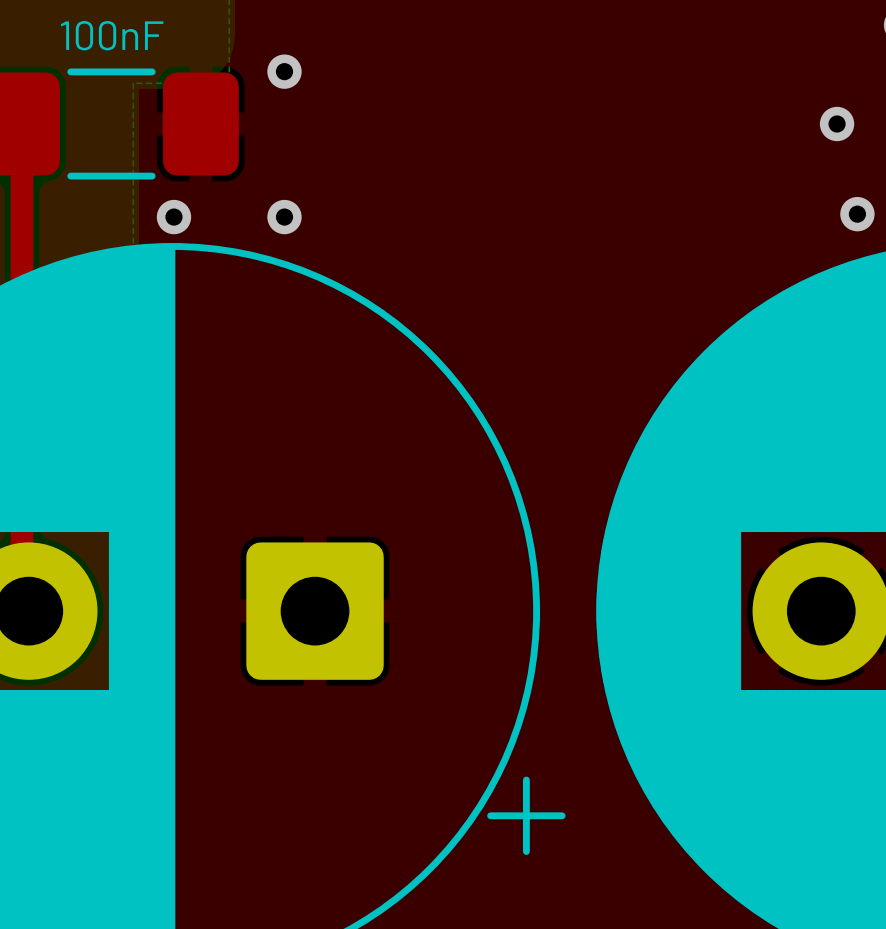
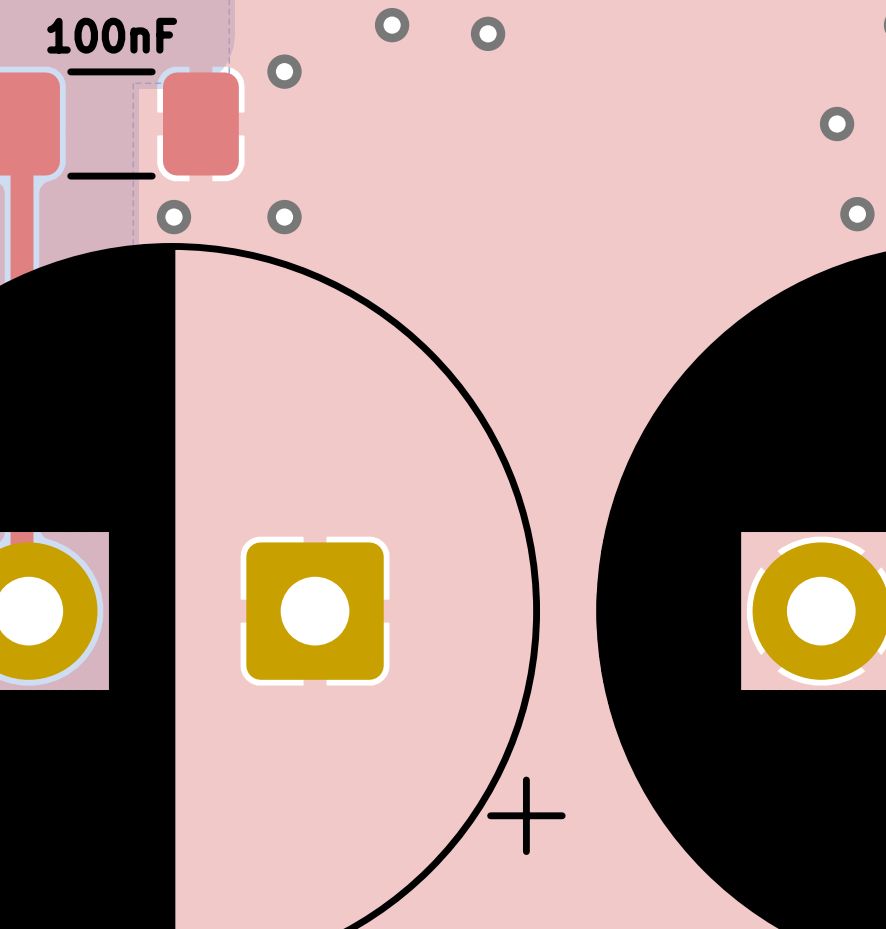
via: none -> (392, 25)
via: none -> (488, 33)

